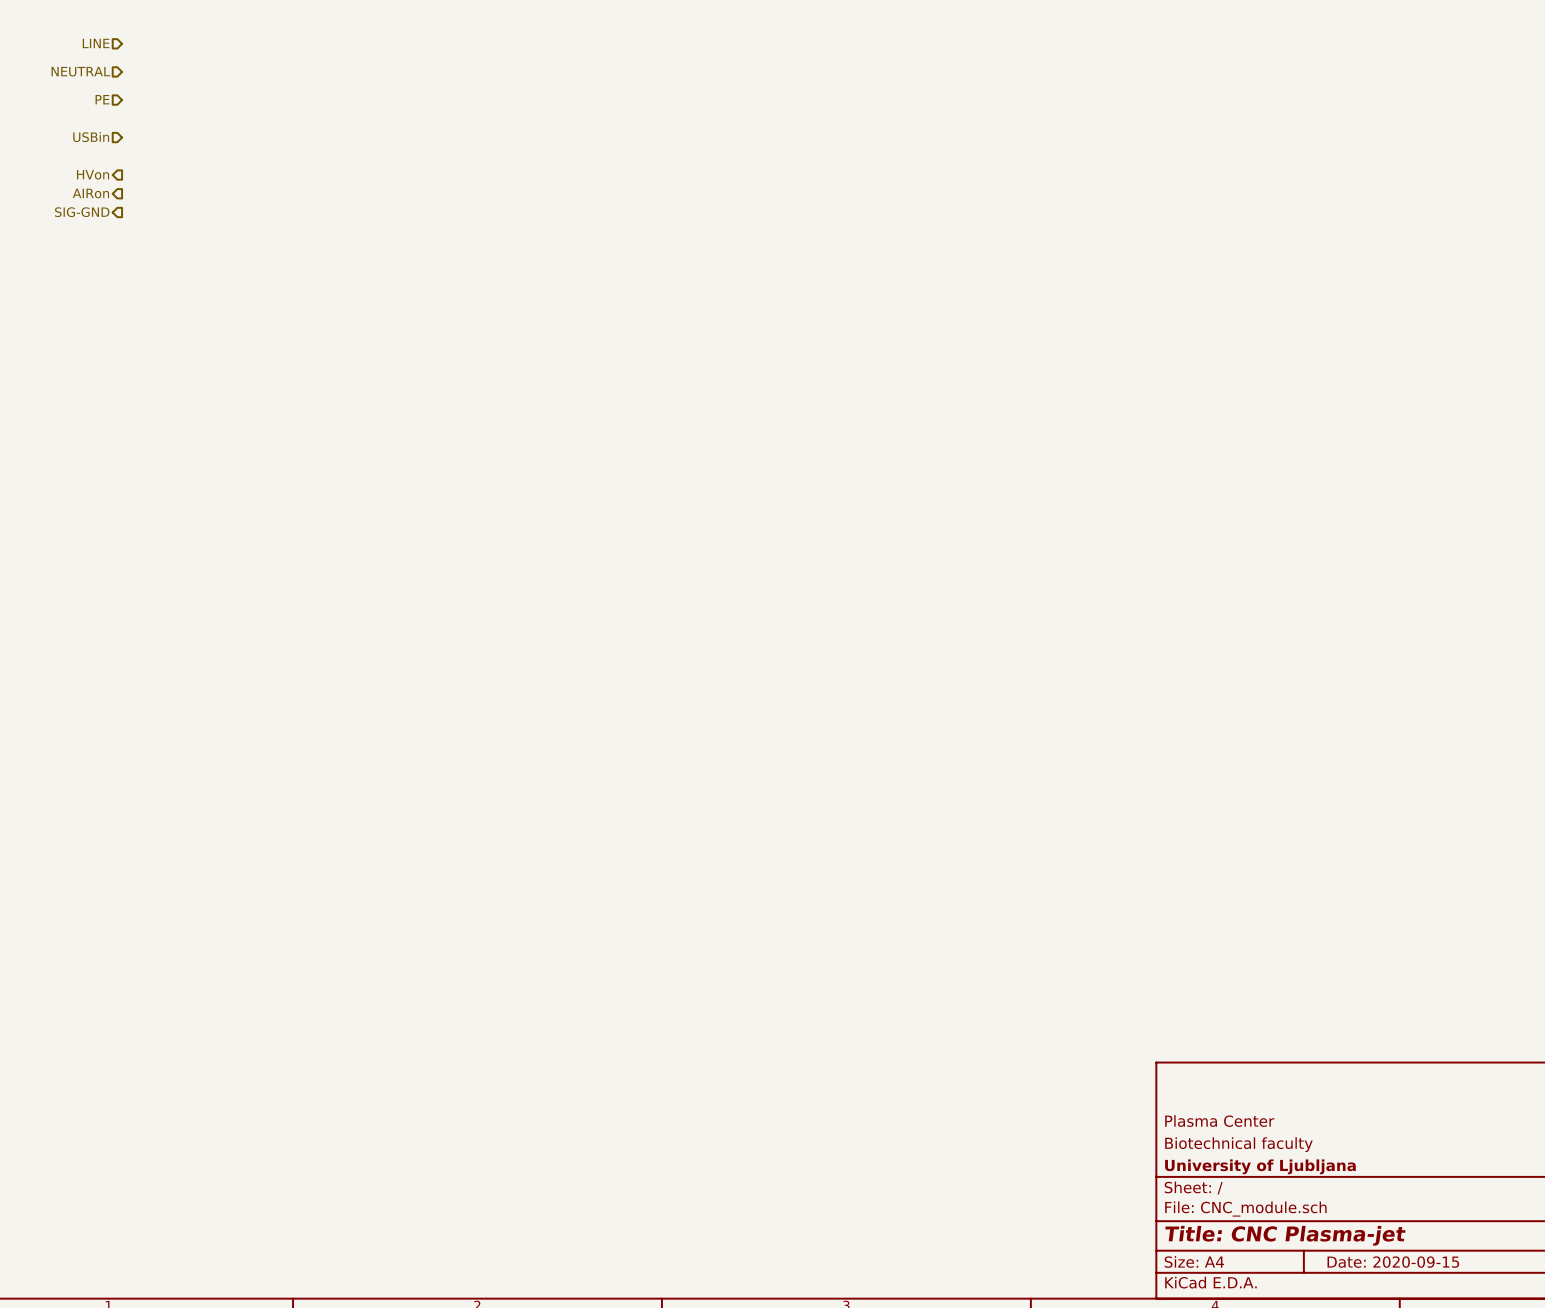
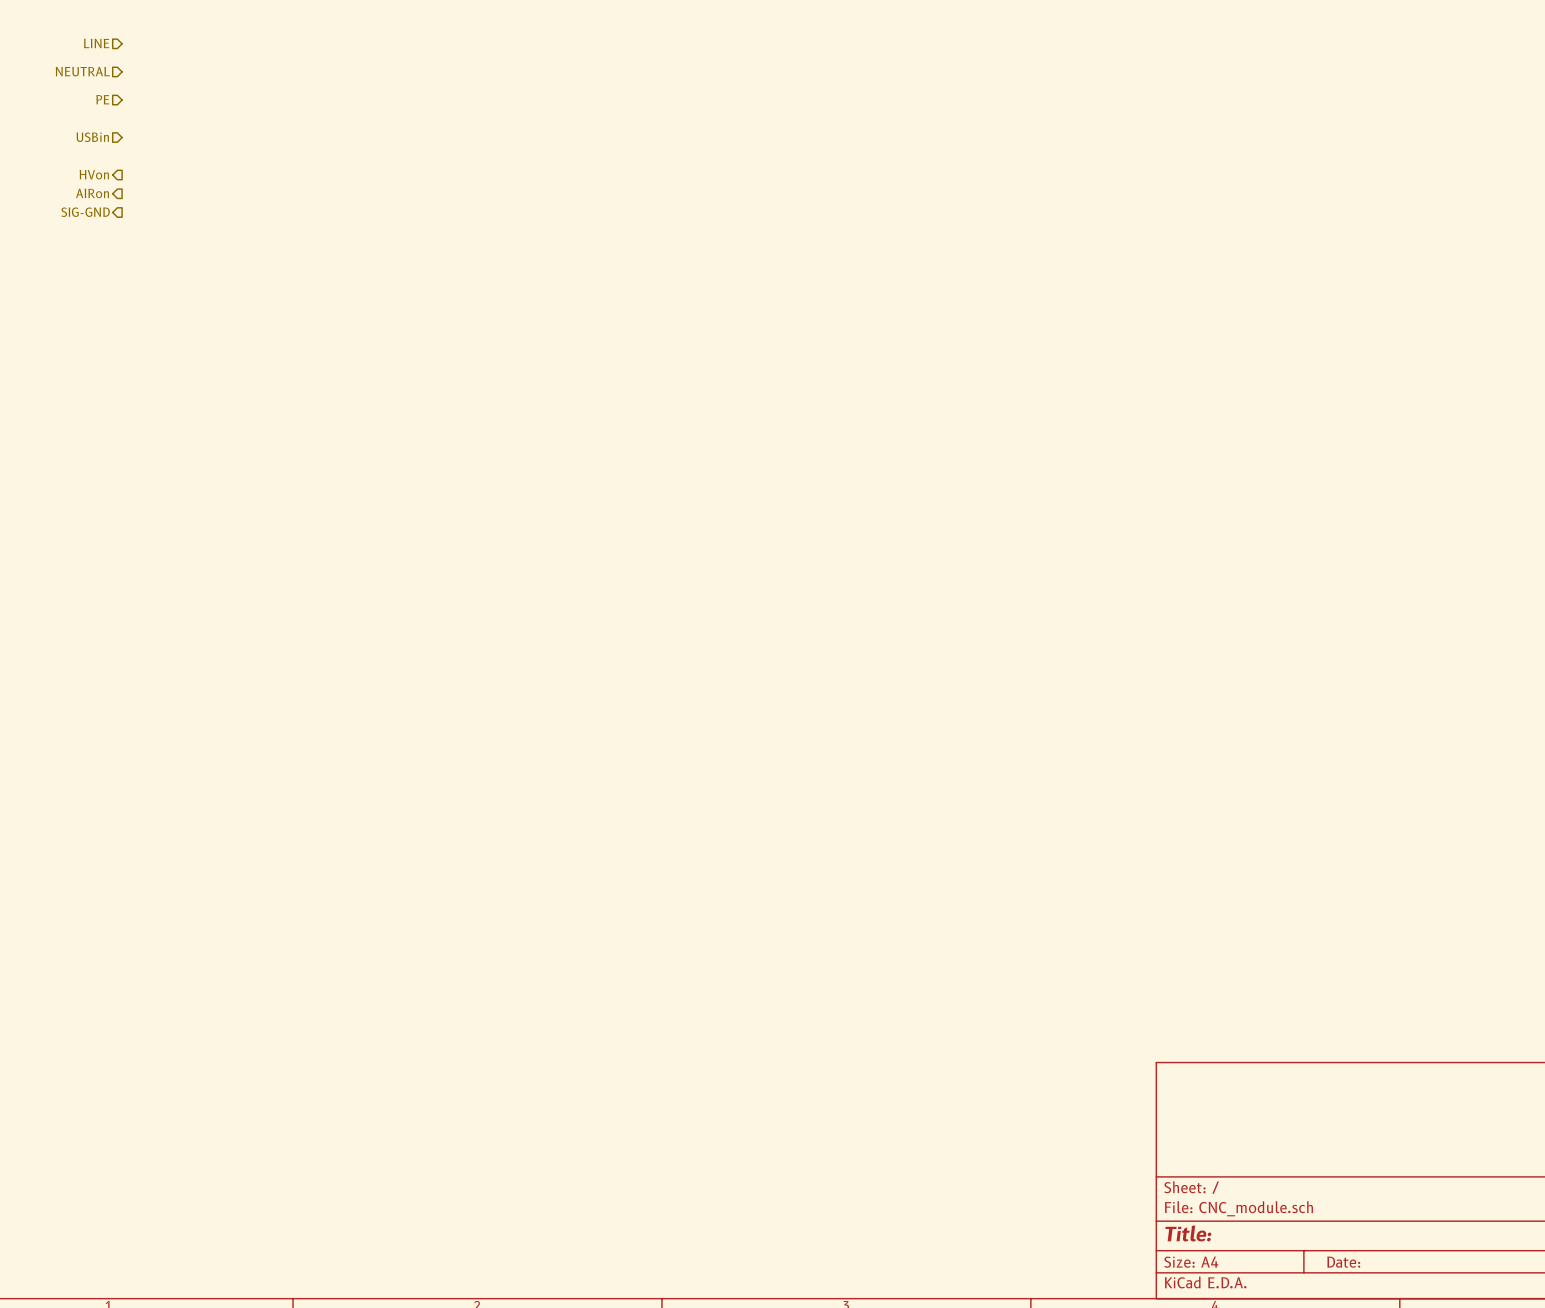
title block: Plasma Center (1219, 1121) -> none
title block: Biotechnical faculty (1238, 1144) -> none
title block: University of Ljubljana (1260, 1166) -> none
title block: Title: CNC Plasma-jet (1285, 1235) -> Title: (1188, 1233)
title block: Date: 2020-09-15 (1393, 1262) -> Date: (1343, 1262)

